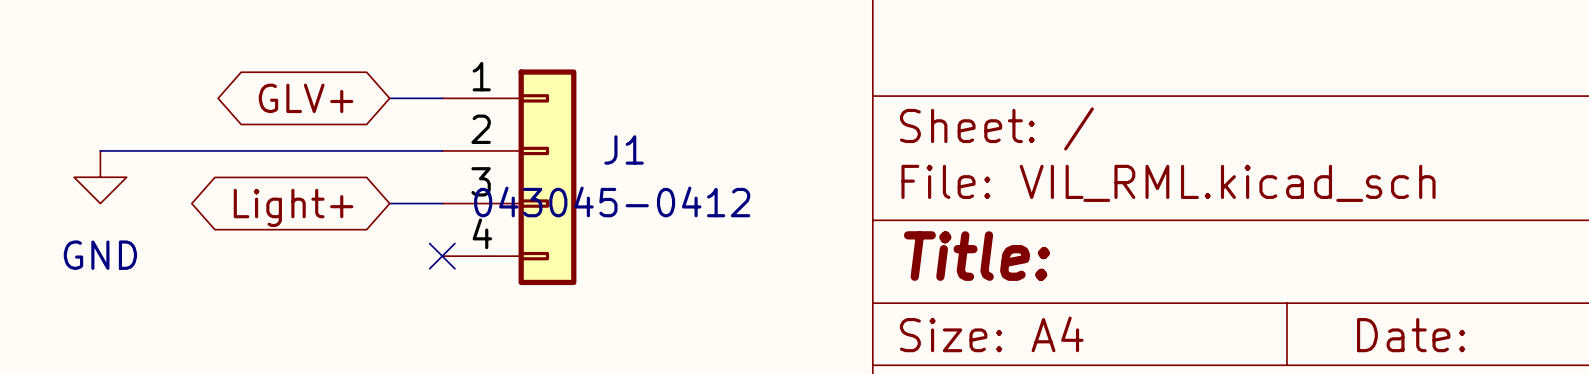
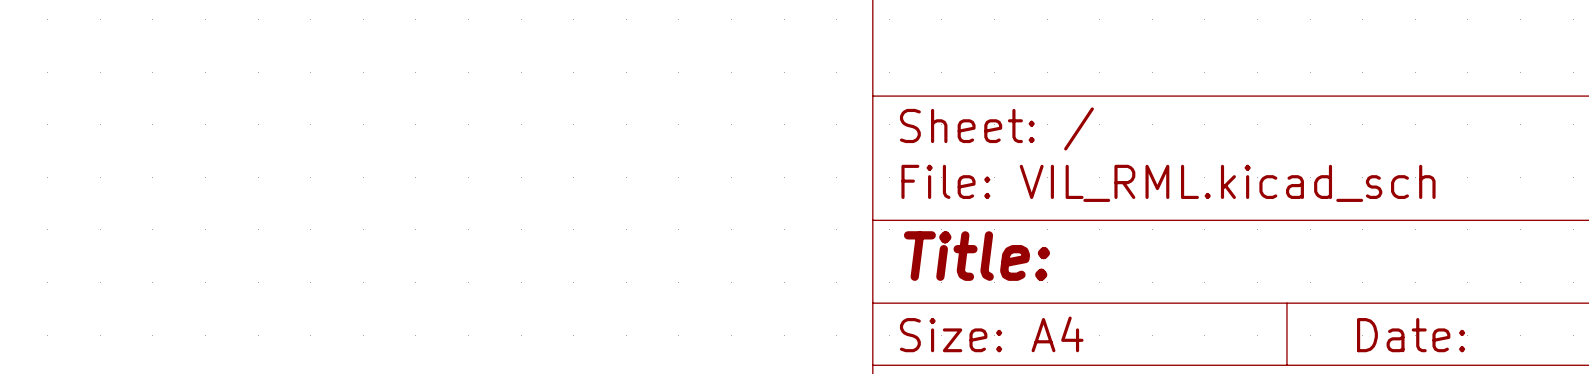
global label: GLV+ (306, 98) -> none
wire: (389, 98) (442, 98) -> none
wire: (100, 150) (442, 150) -> none
power symbol: GND (100, 177) -> none
J1: 043045-0412 (509, 177) -> none
wire: (389, 203) (442, 203) -> none
global label: Light+ (293, 207) -> none
no-connect mark: (442, 256) -> none

